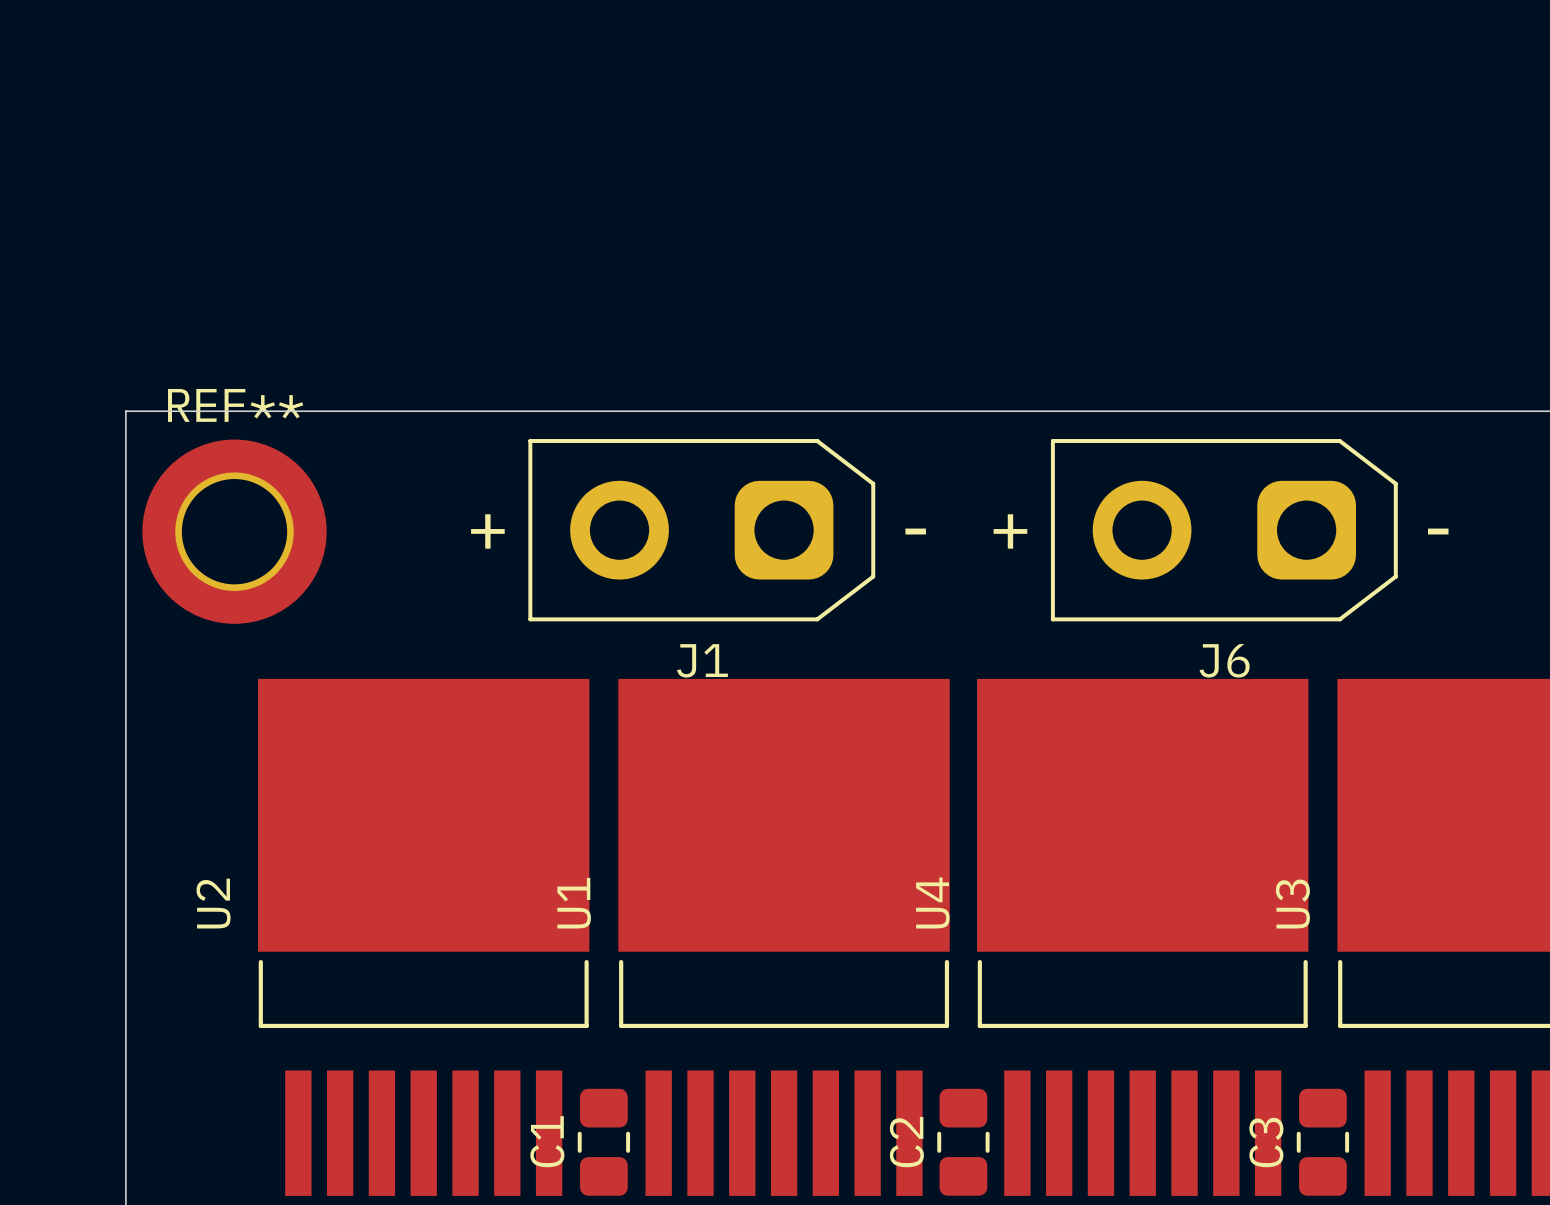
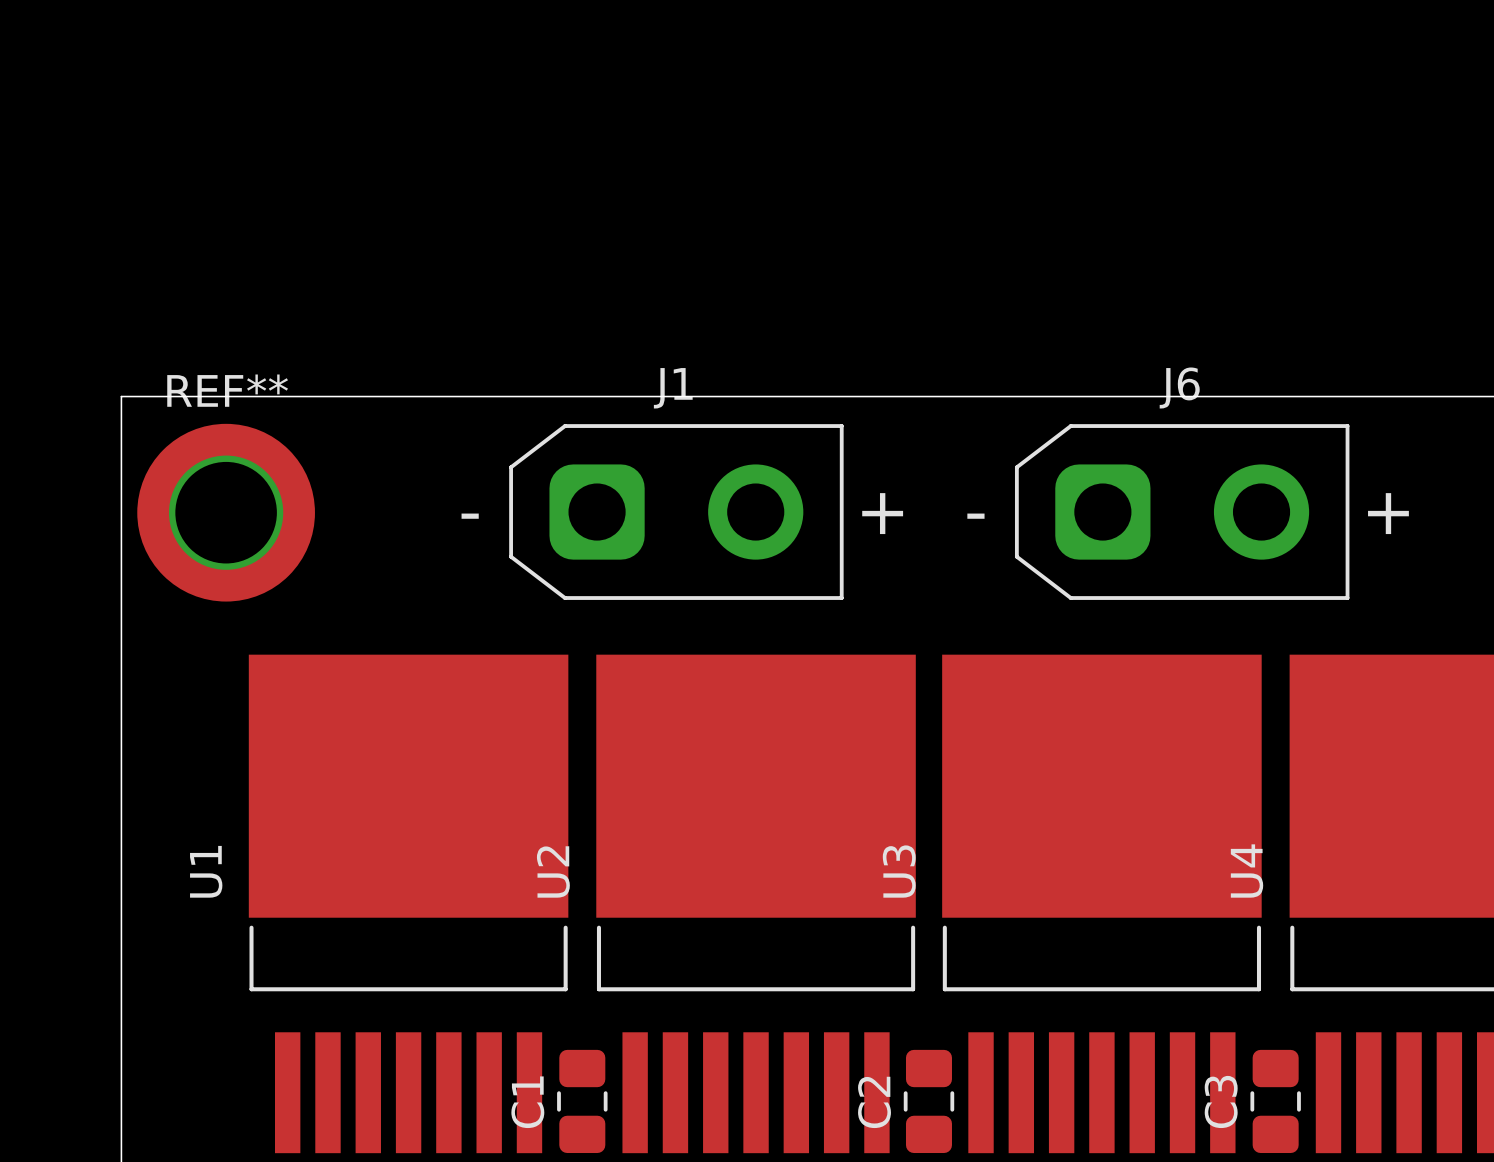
J1 rotation: 0° (701, 530) -> 180° (676, 512)
J6 rotation: 0° (1224, 530) -> 180° (1182, 512)
U4 name: U4 (932, 902) -> U3 (899, 871)
U2 name: U2 (213, 903) -> U1 (206, 871)
U1 name: U1 (574, 903) -> U2 (553, 871)
U3 name: U3 (1292, 904) -> U4 (1247, 871)

